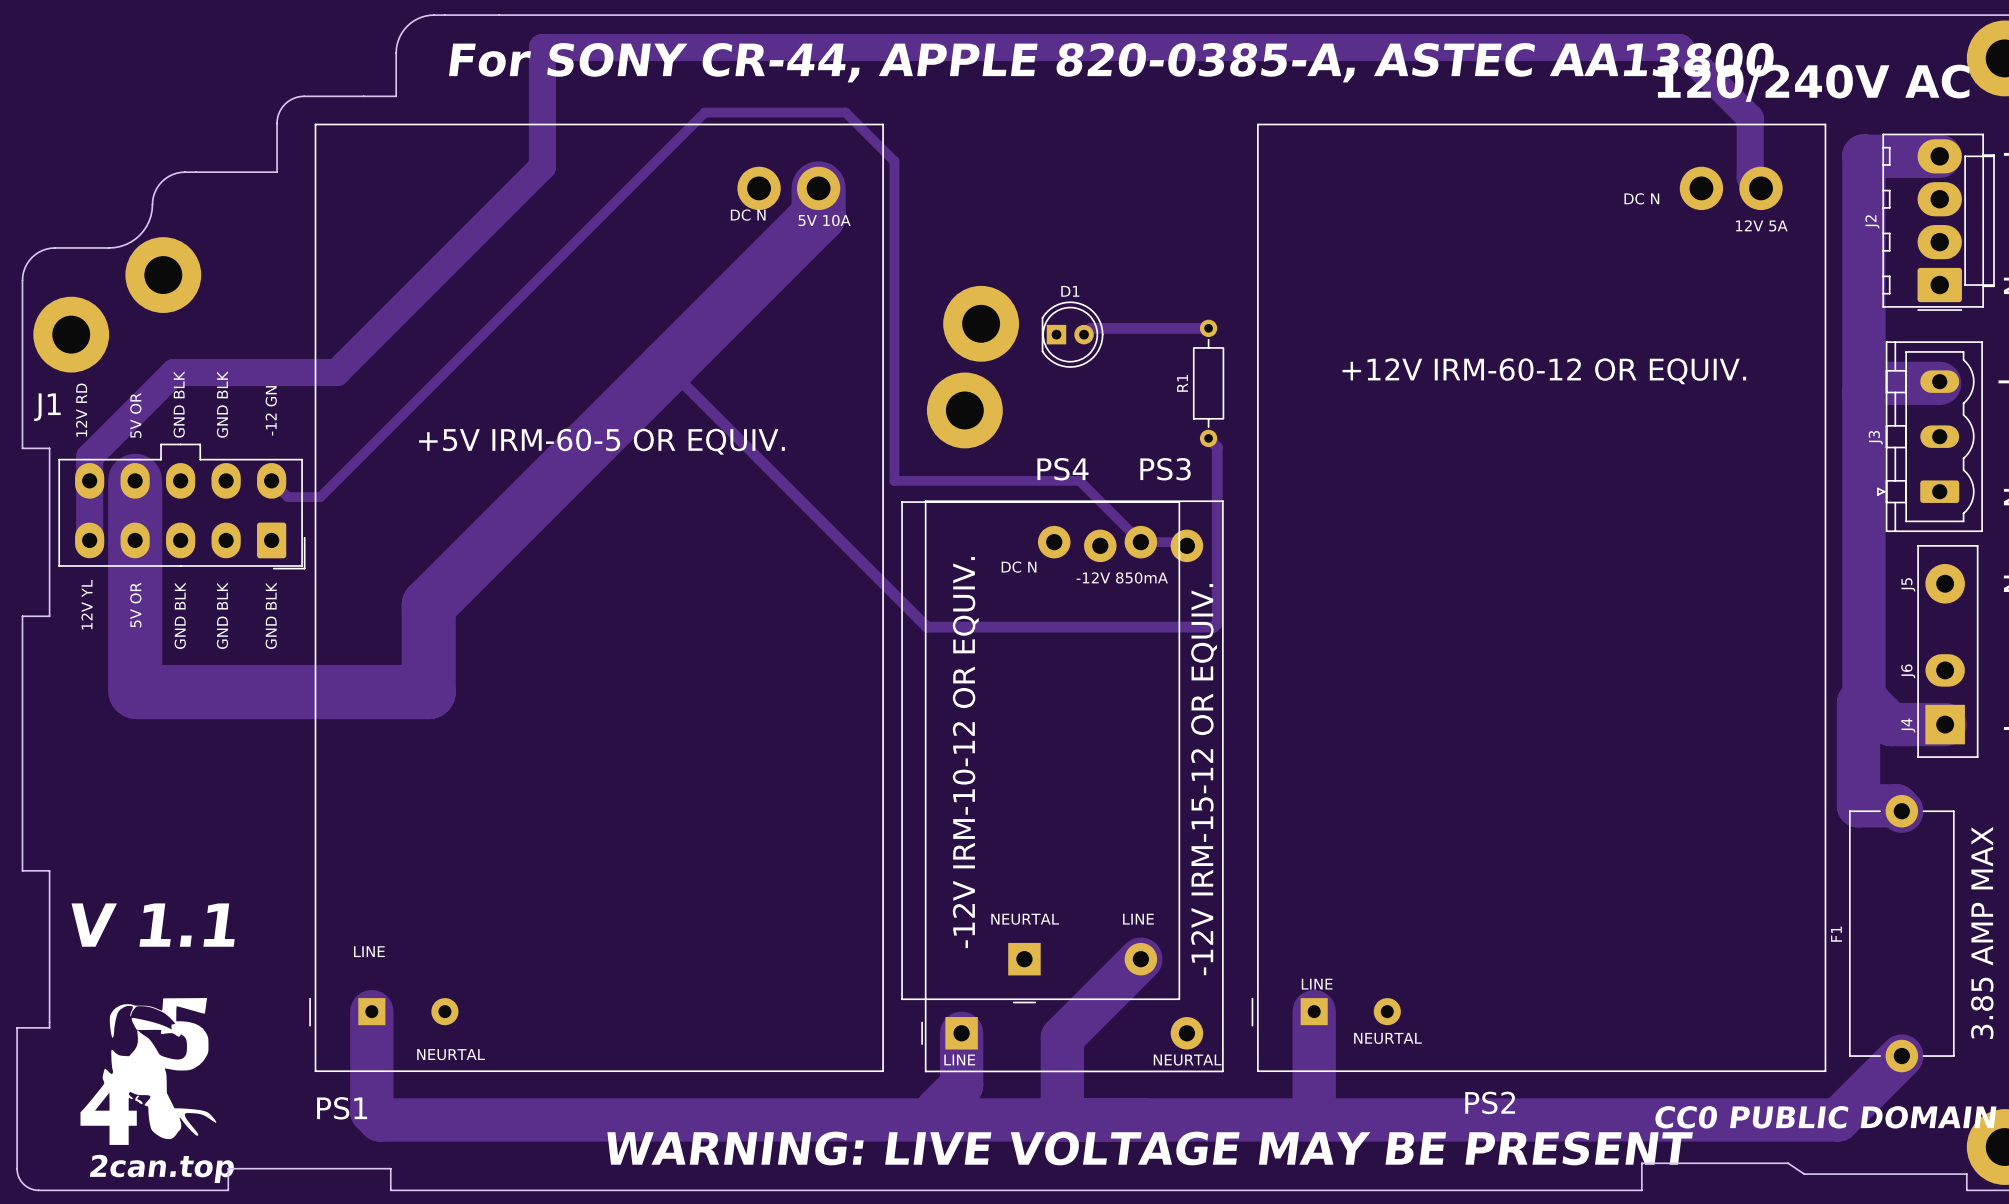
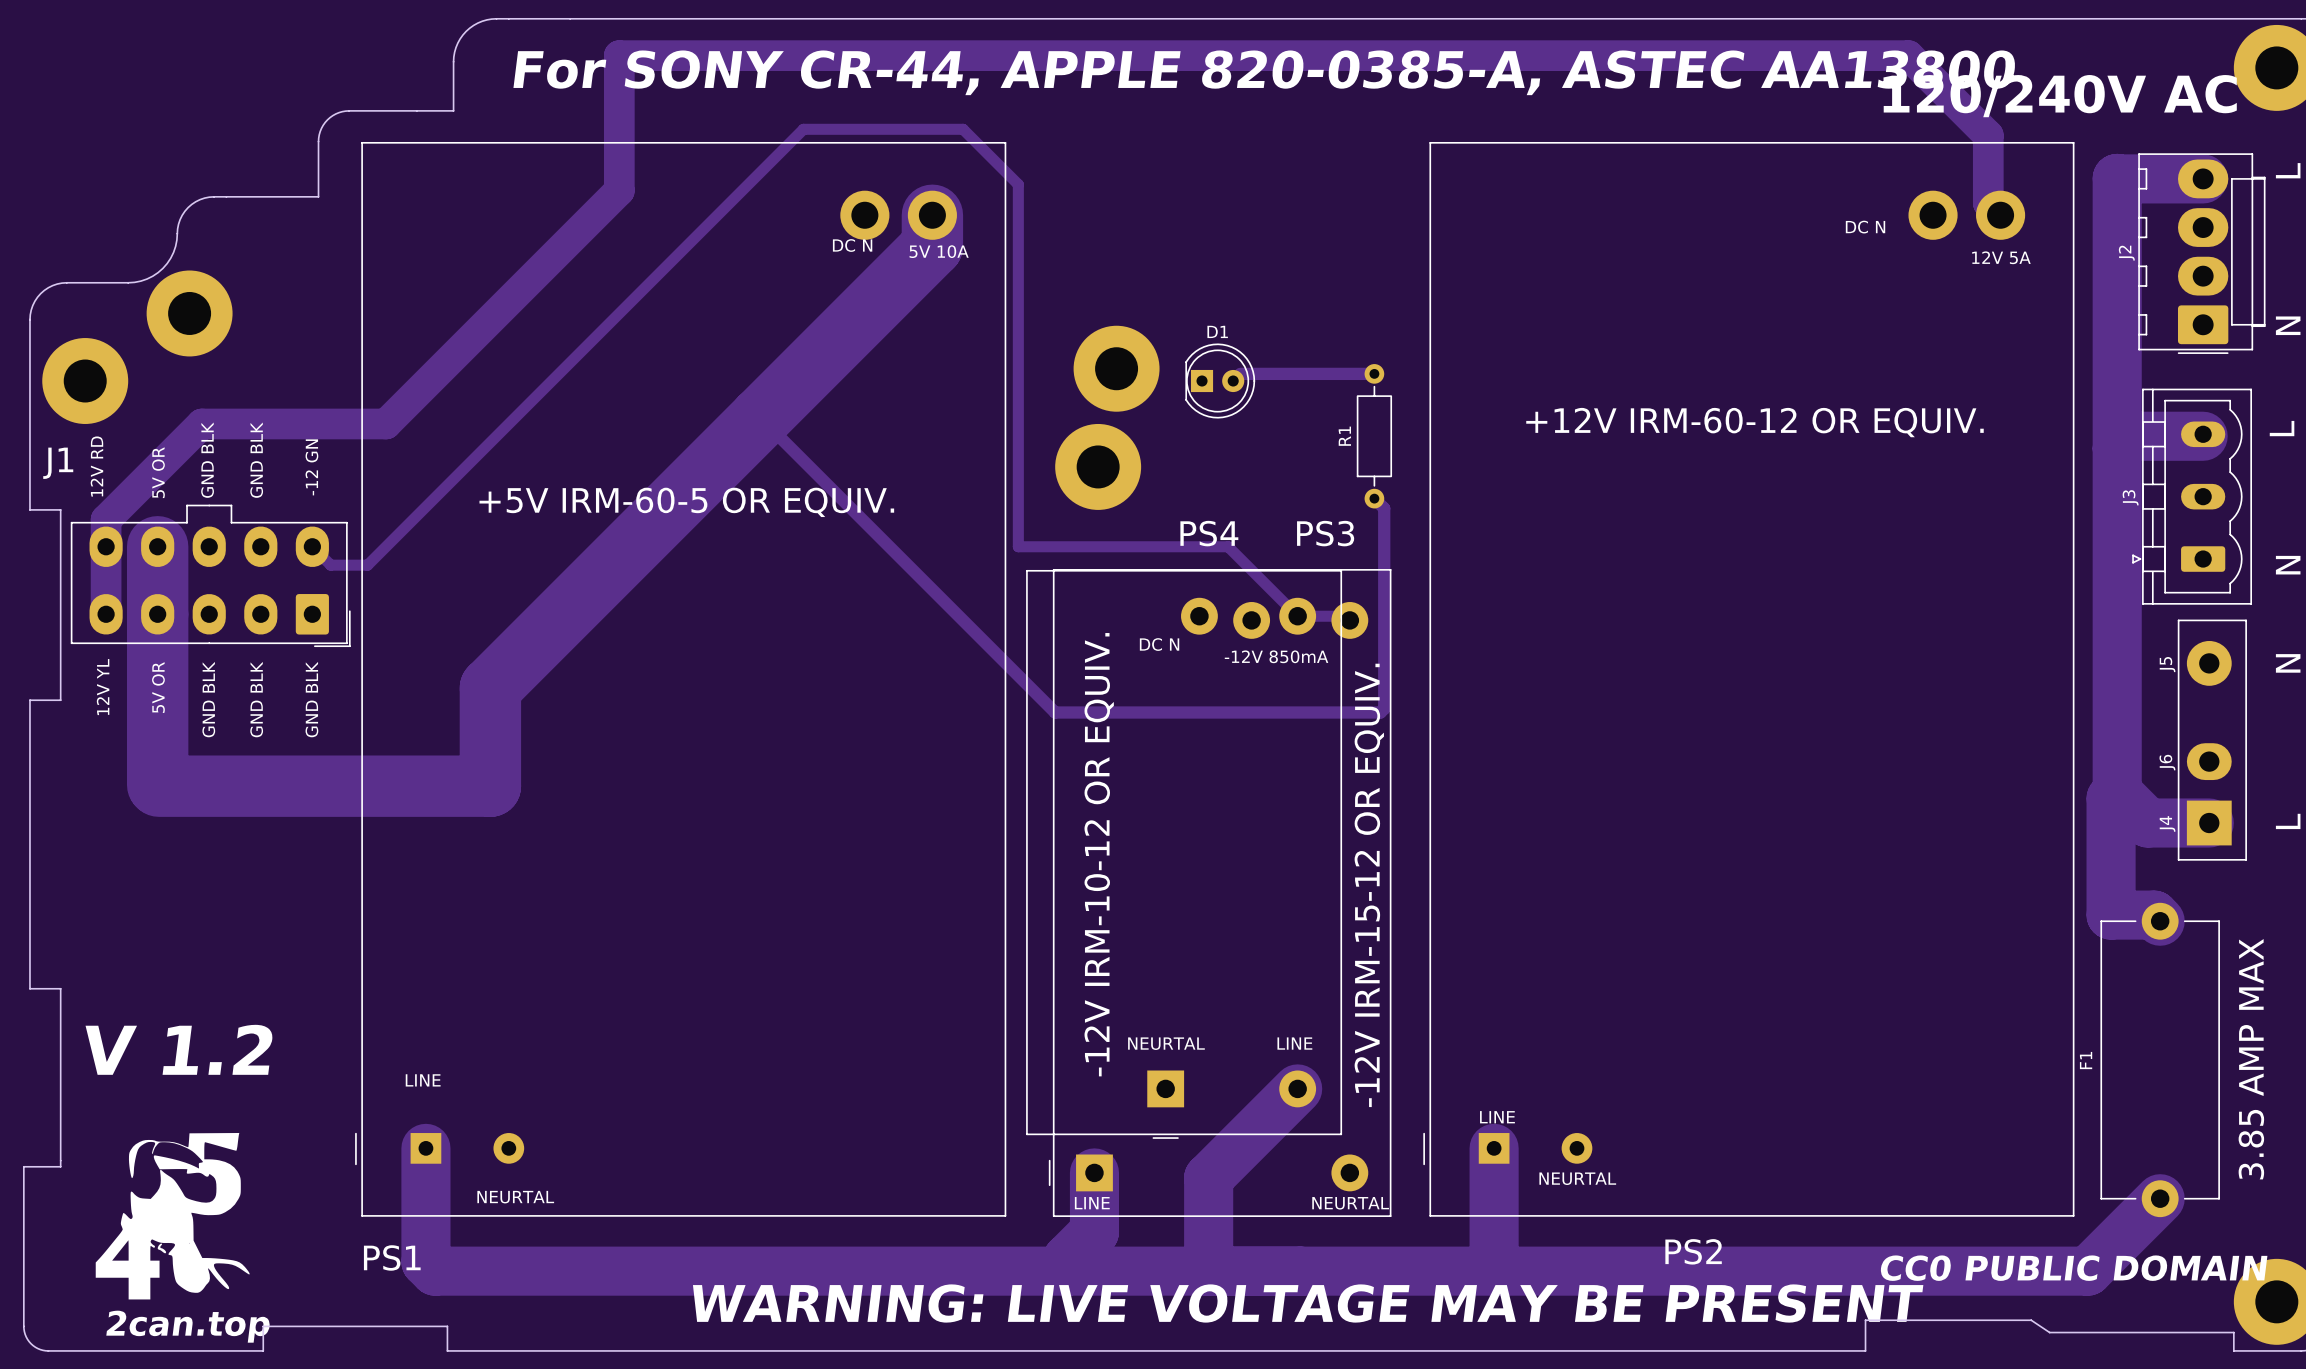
text: V 1.1 (153, 925) -> V 1.2 (179, 1049)

